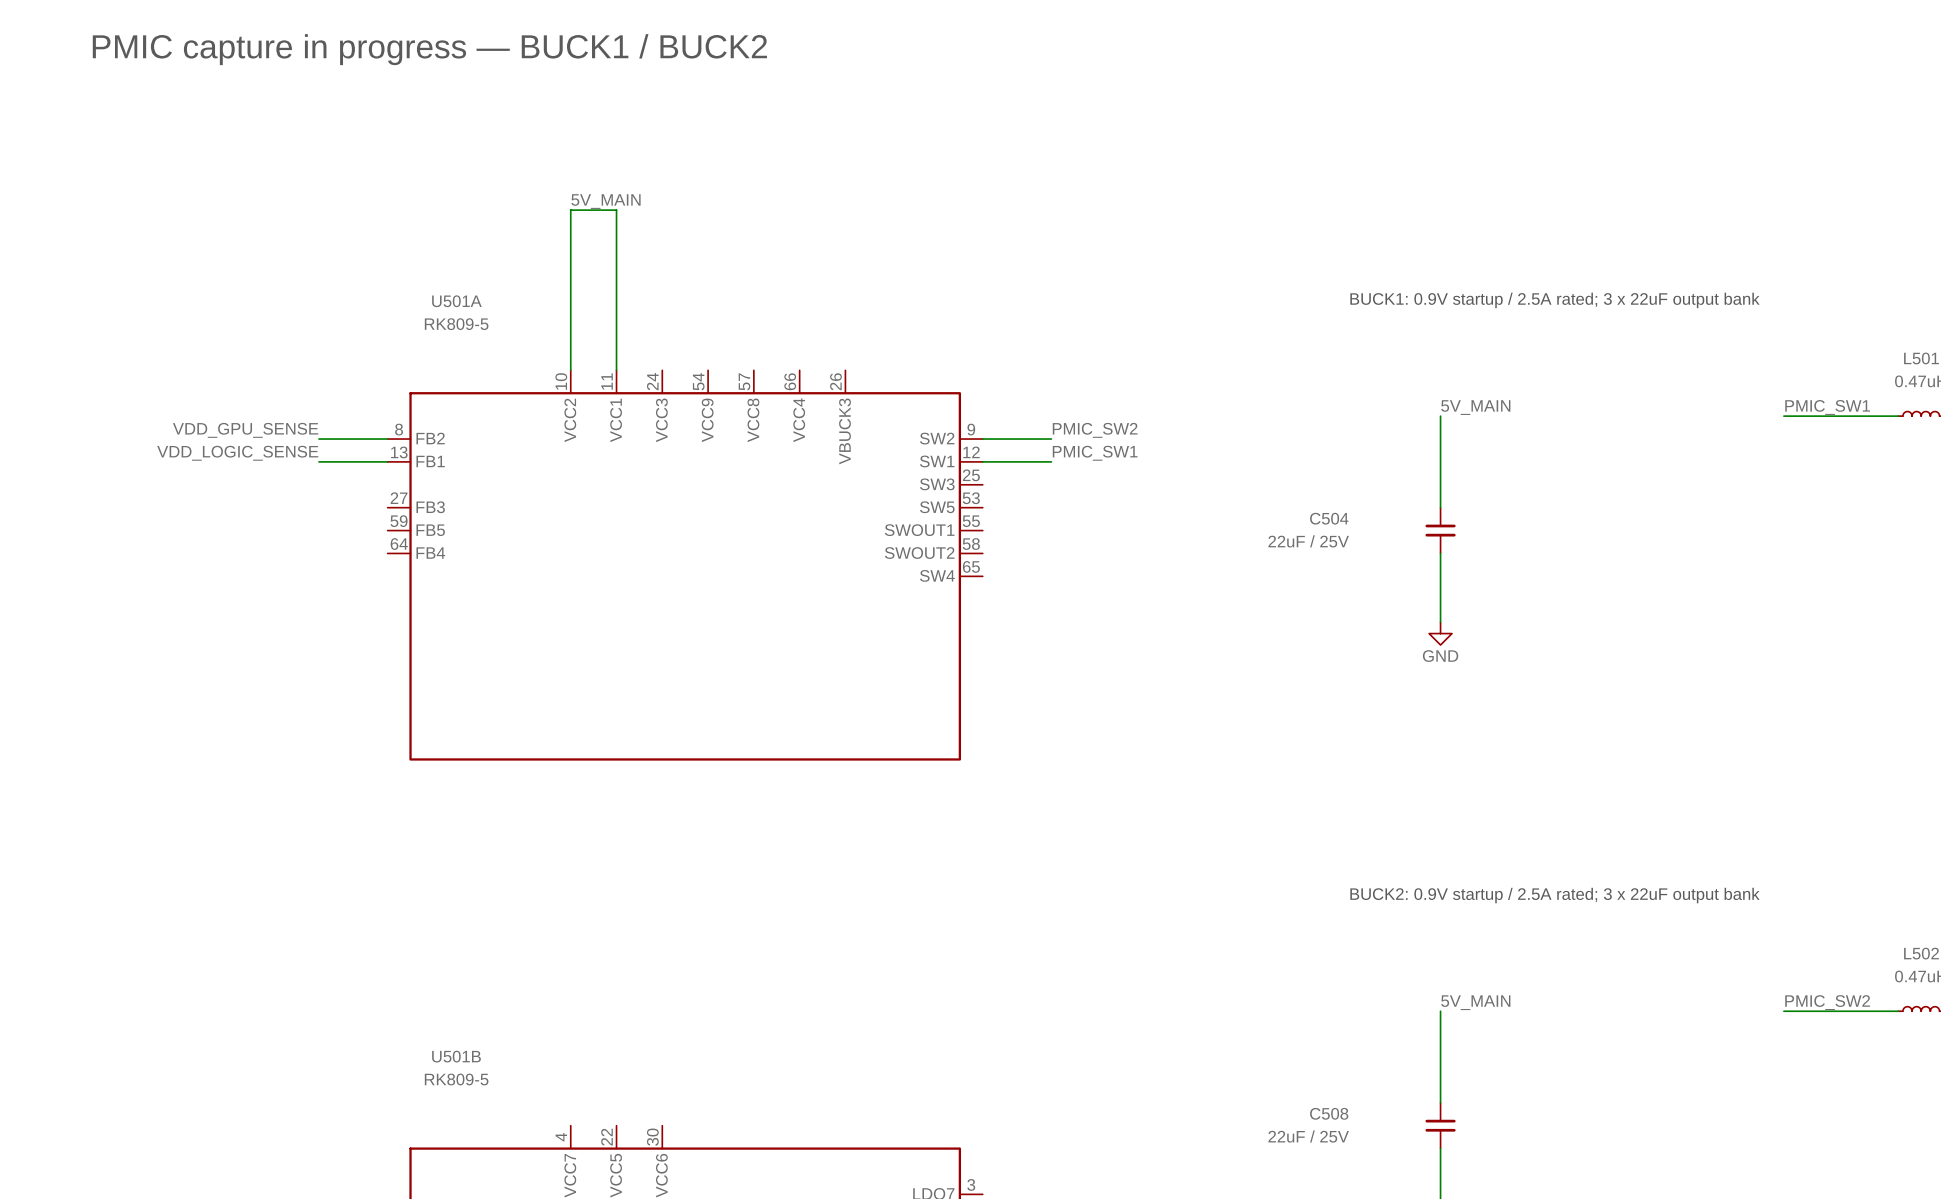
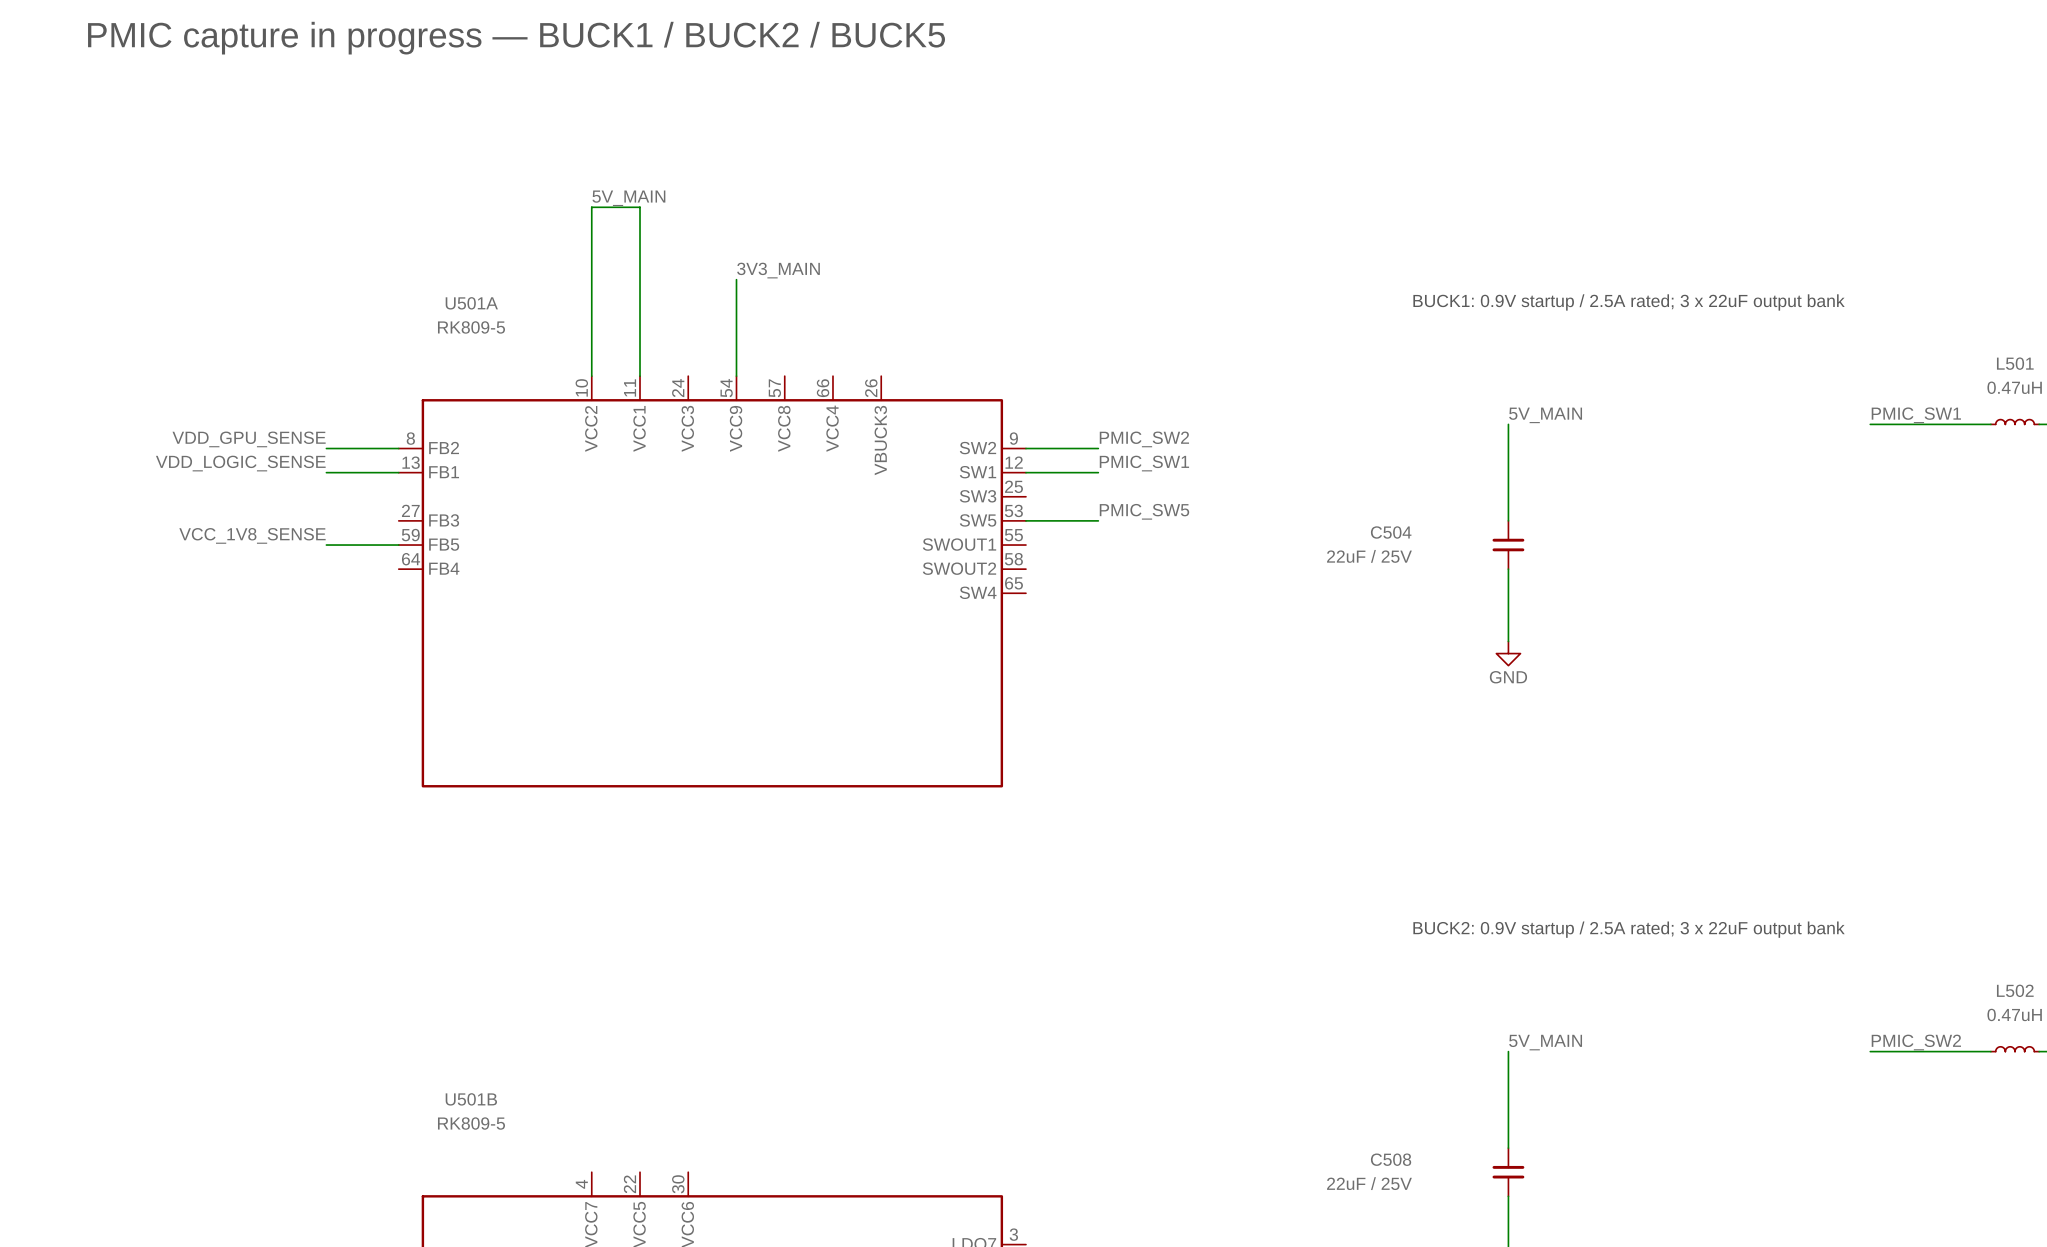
text: PMIC capture in progress — BUCK1 / BUCK2 (429, 49) -> PMIC capture in progress — BUCK1 / BUCK2 / BUCK5 (516, 38)
label: none -> 3V3_MAIN (778, 270)
wire: none -> (736, 279) (736, 376)
label: none -> PMIC_SW5 (1144, 511)
wire: none -> (1025, 520) (1098, 520)
label: none -> VCC_1V8_SENSE (252, 535)
wire: none -> (326, 545) (398, 545)

